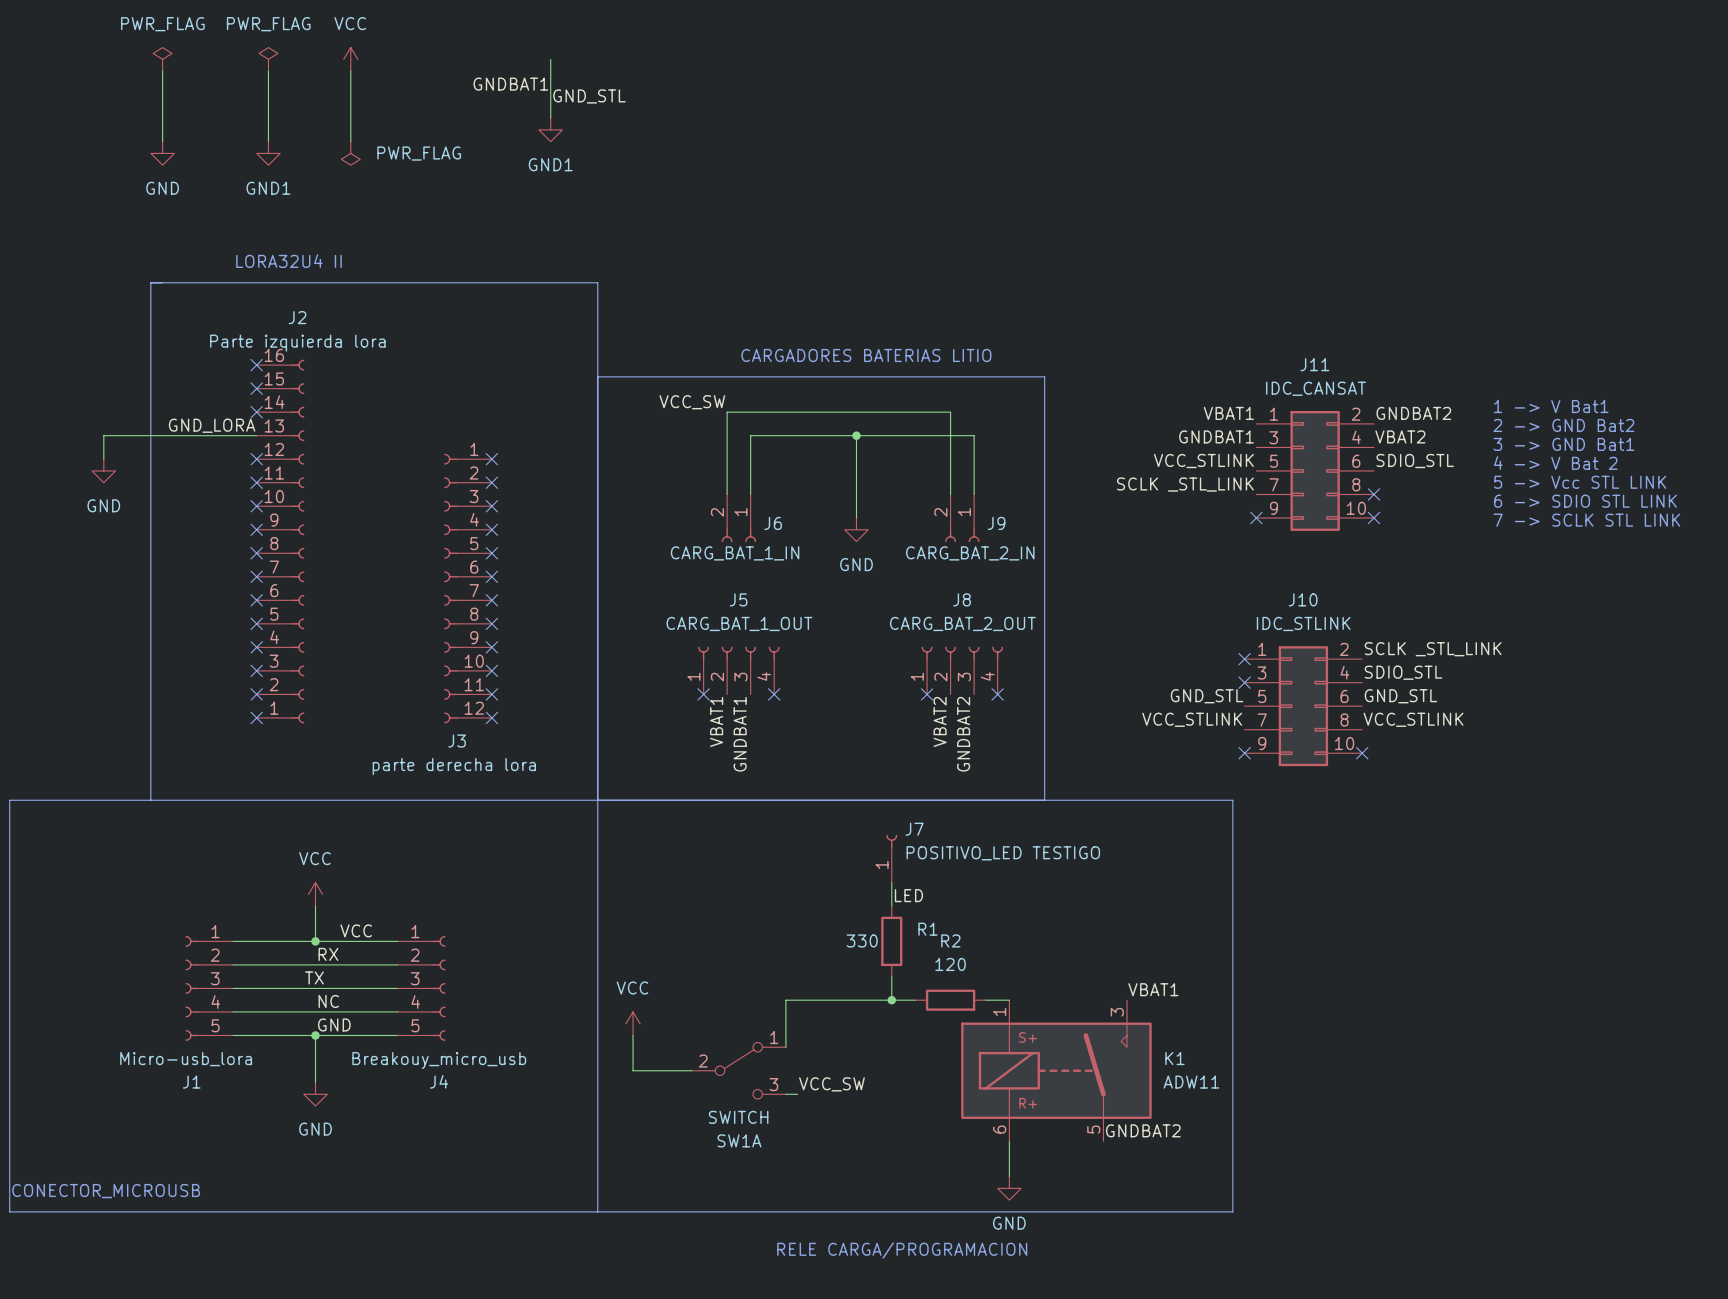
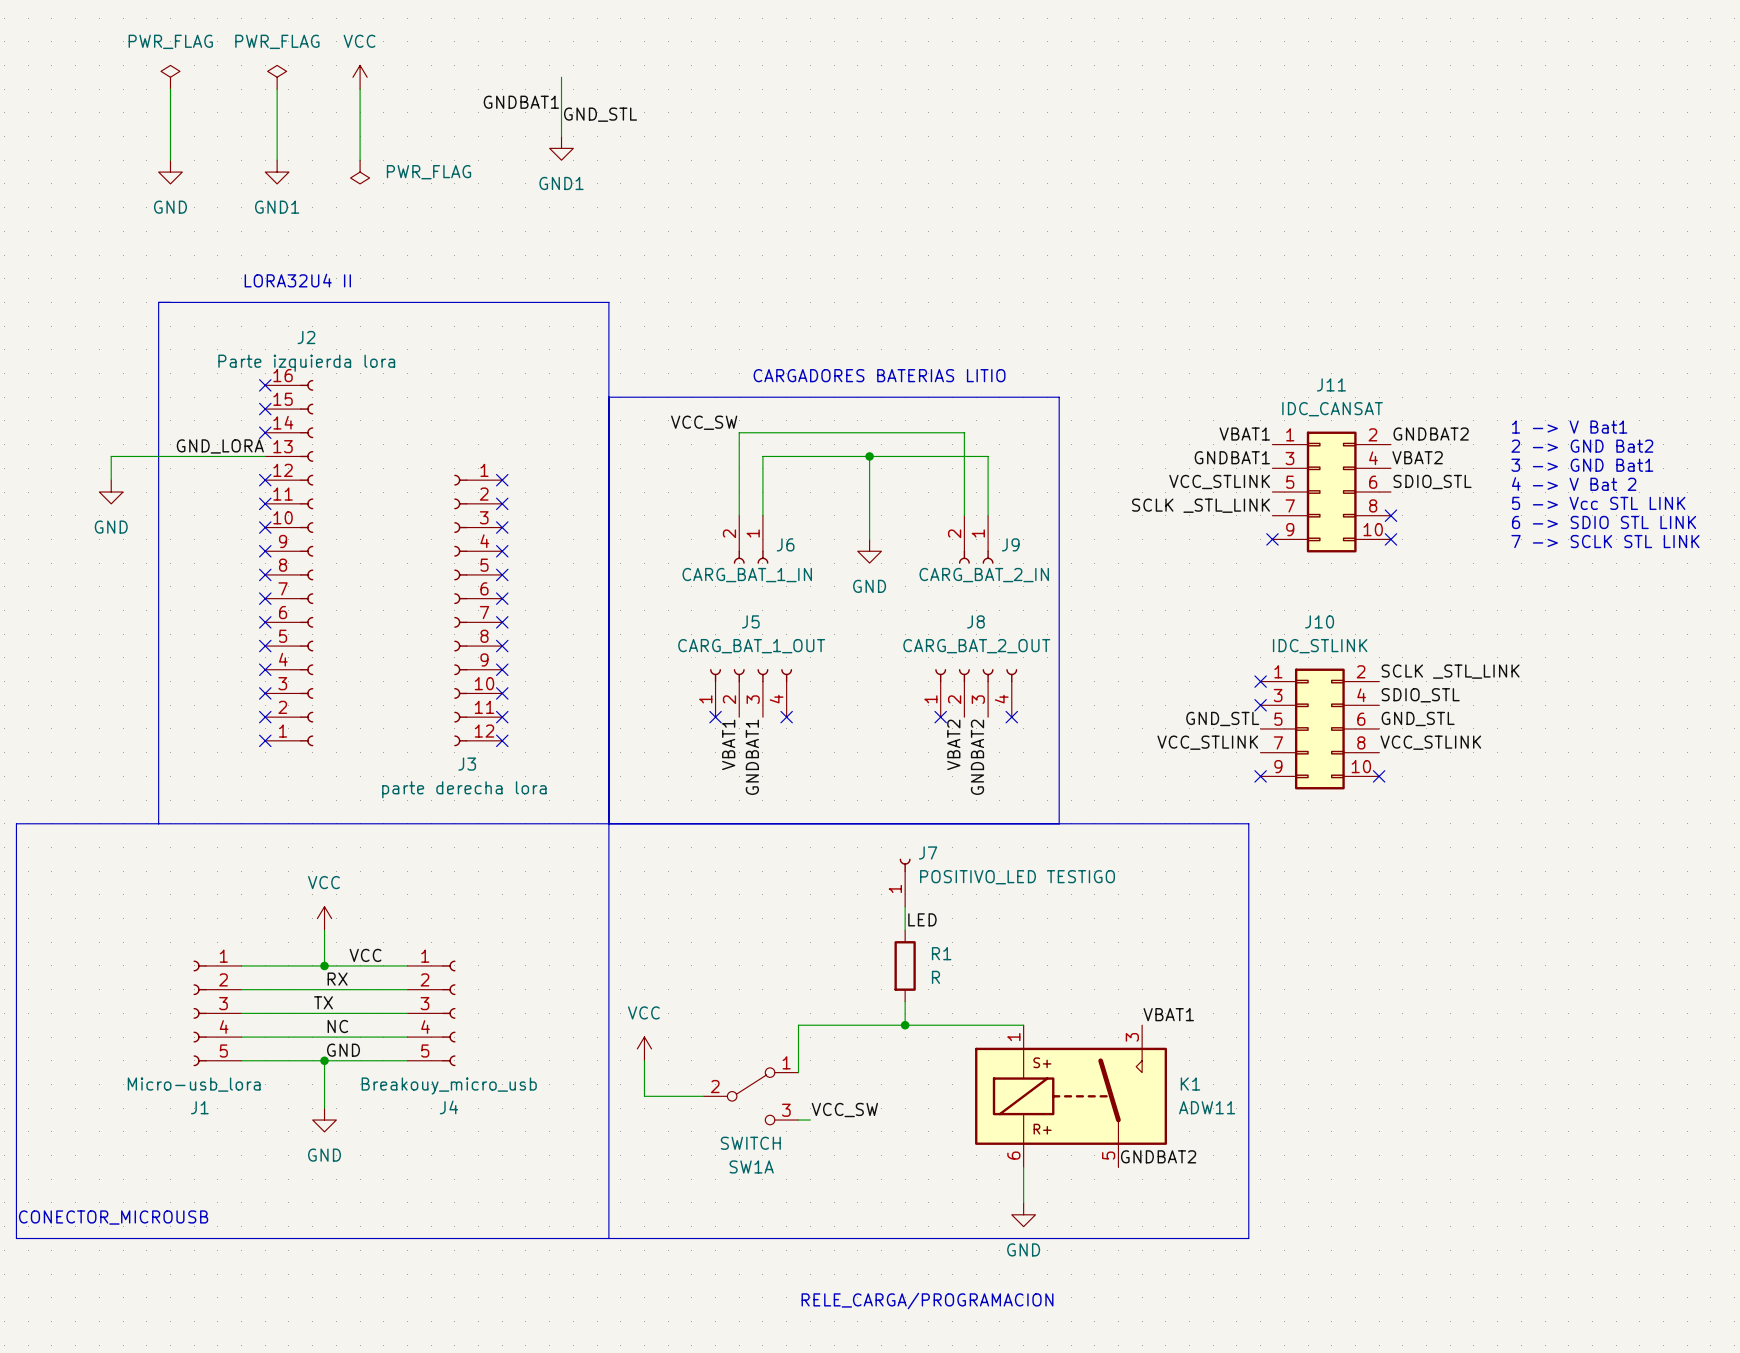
R1 value: 330 (862, 940) -> R (935, 977)
wire: none -> (928, 1025) (999, 1025)
R2: 120 (950, 1000) -> none
text: RELE CARGA/PROGRAMACION (902, 1250) -> RELE_CARGA/PROGRAMACION (927, 1301)

